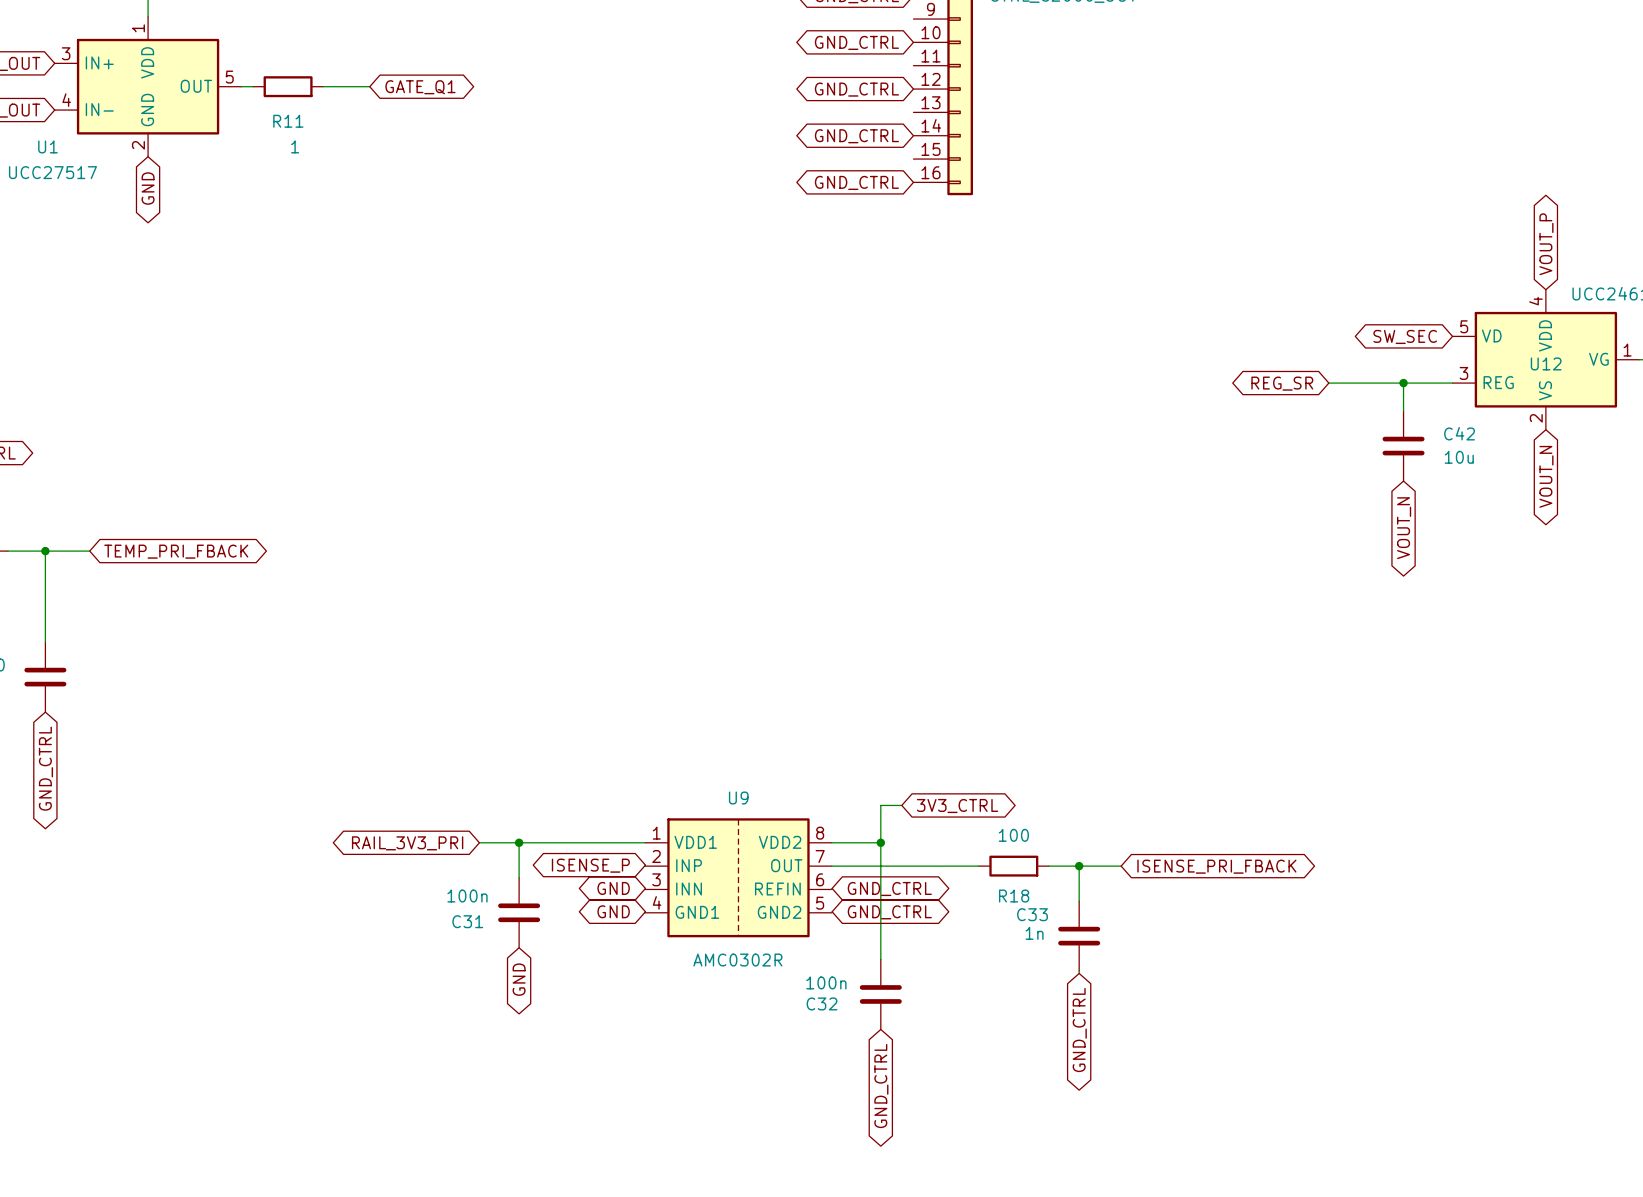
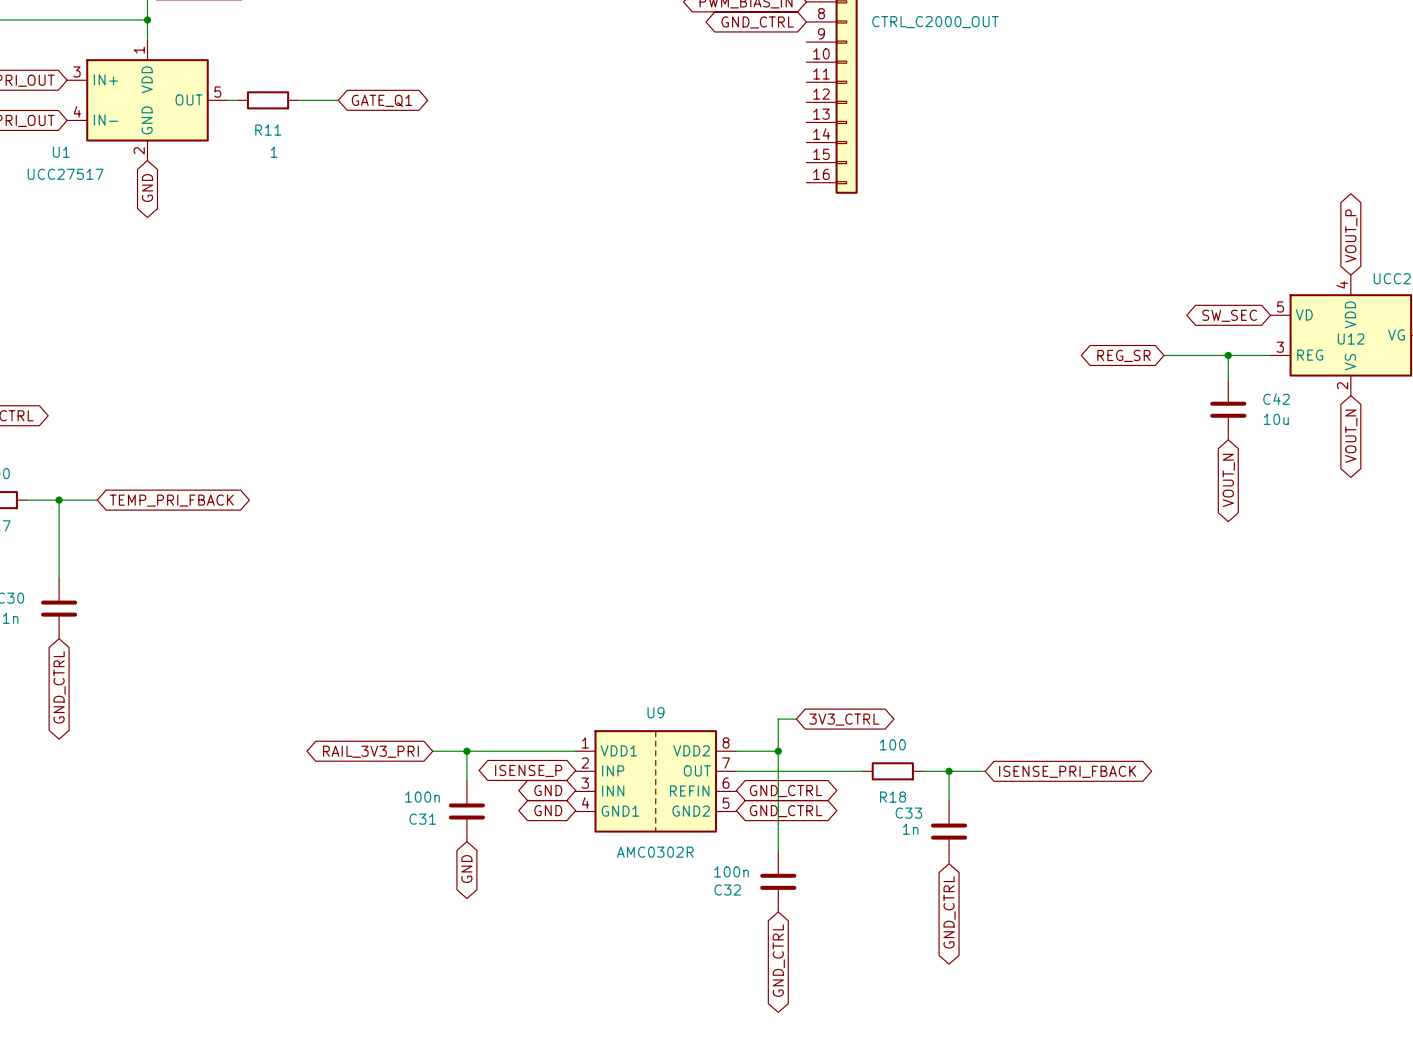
global label: GND_CTRL (856, 42) -> none
global label: GND_CTRL (856, 89) -> none
global label: GND_CTRL (856, 136) -> none
global label: GND_CTRL (856, 182) -> none

